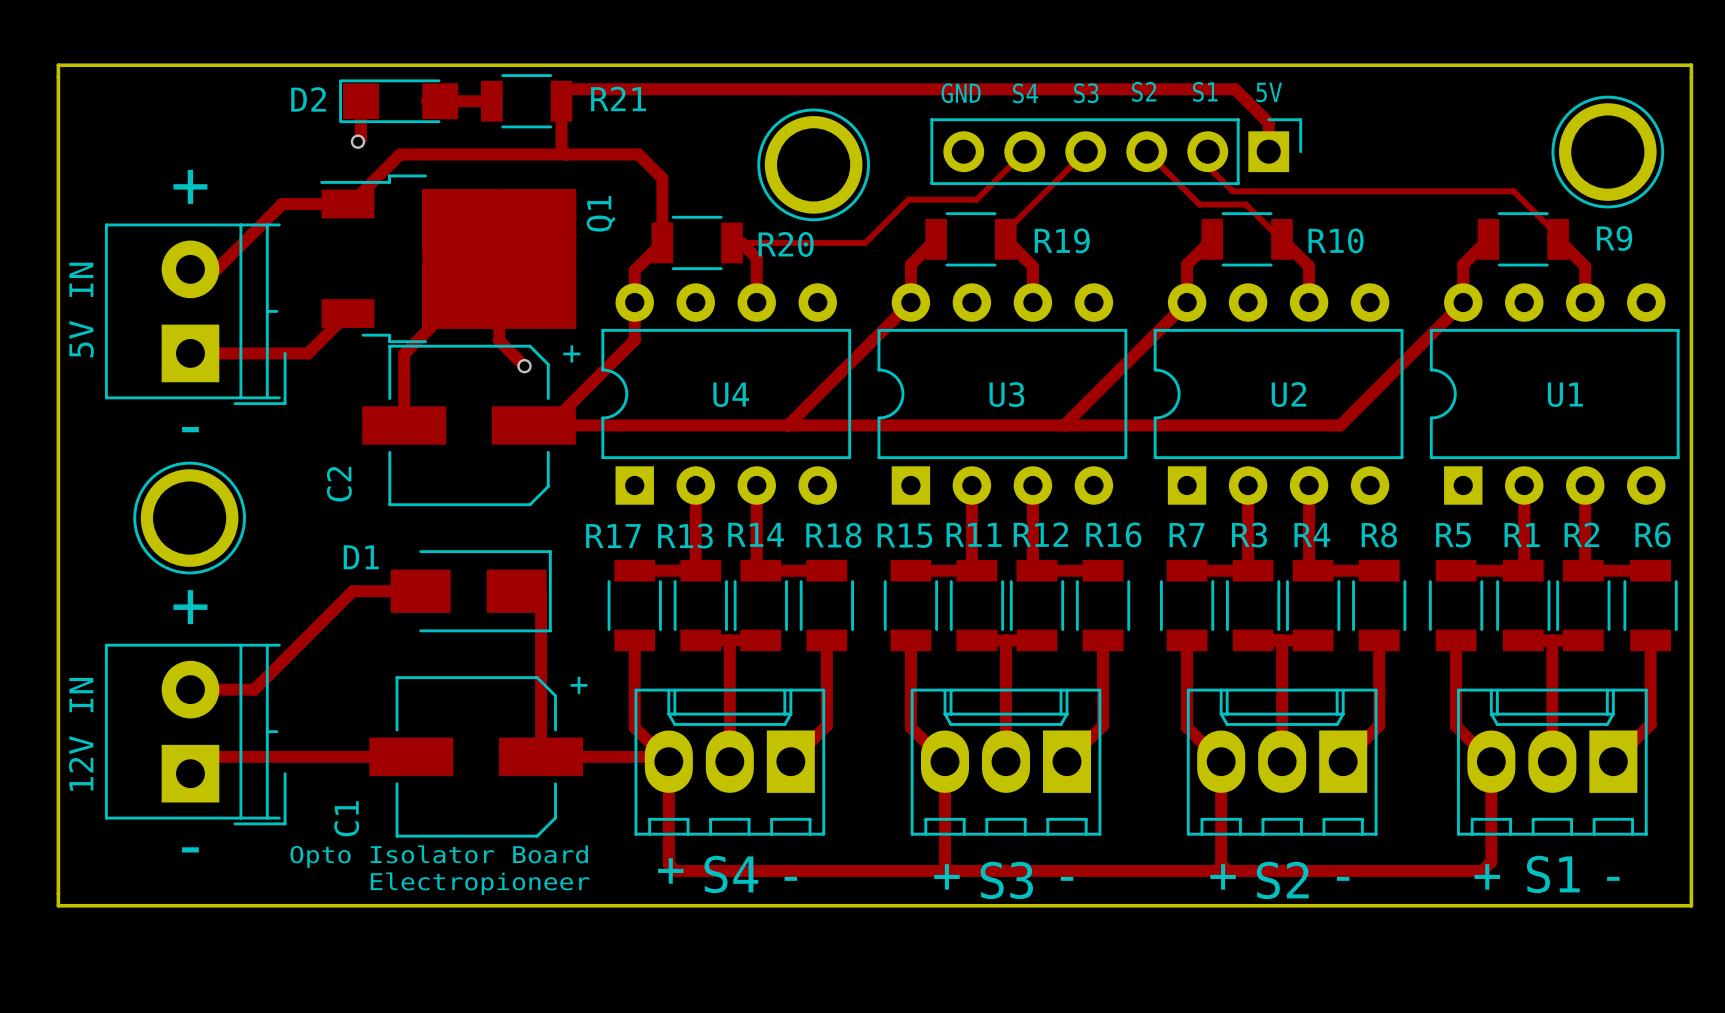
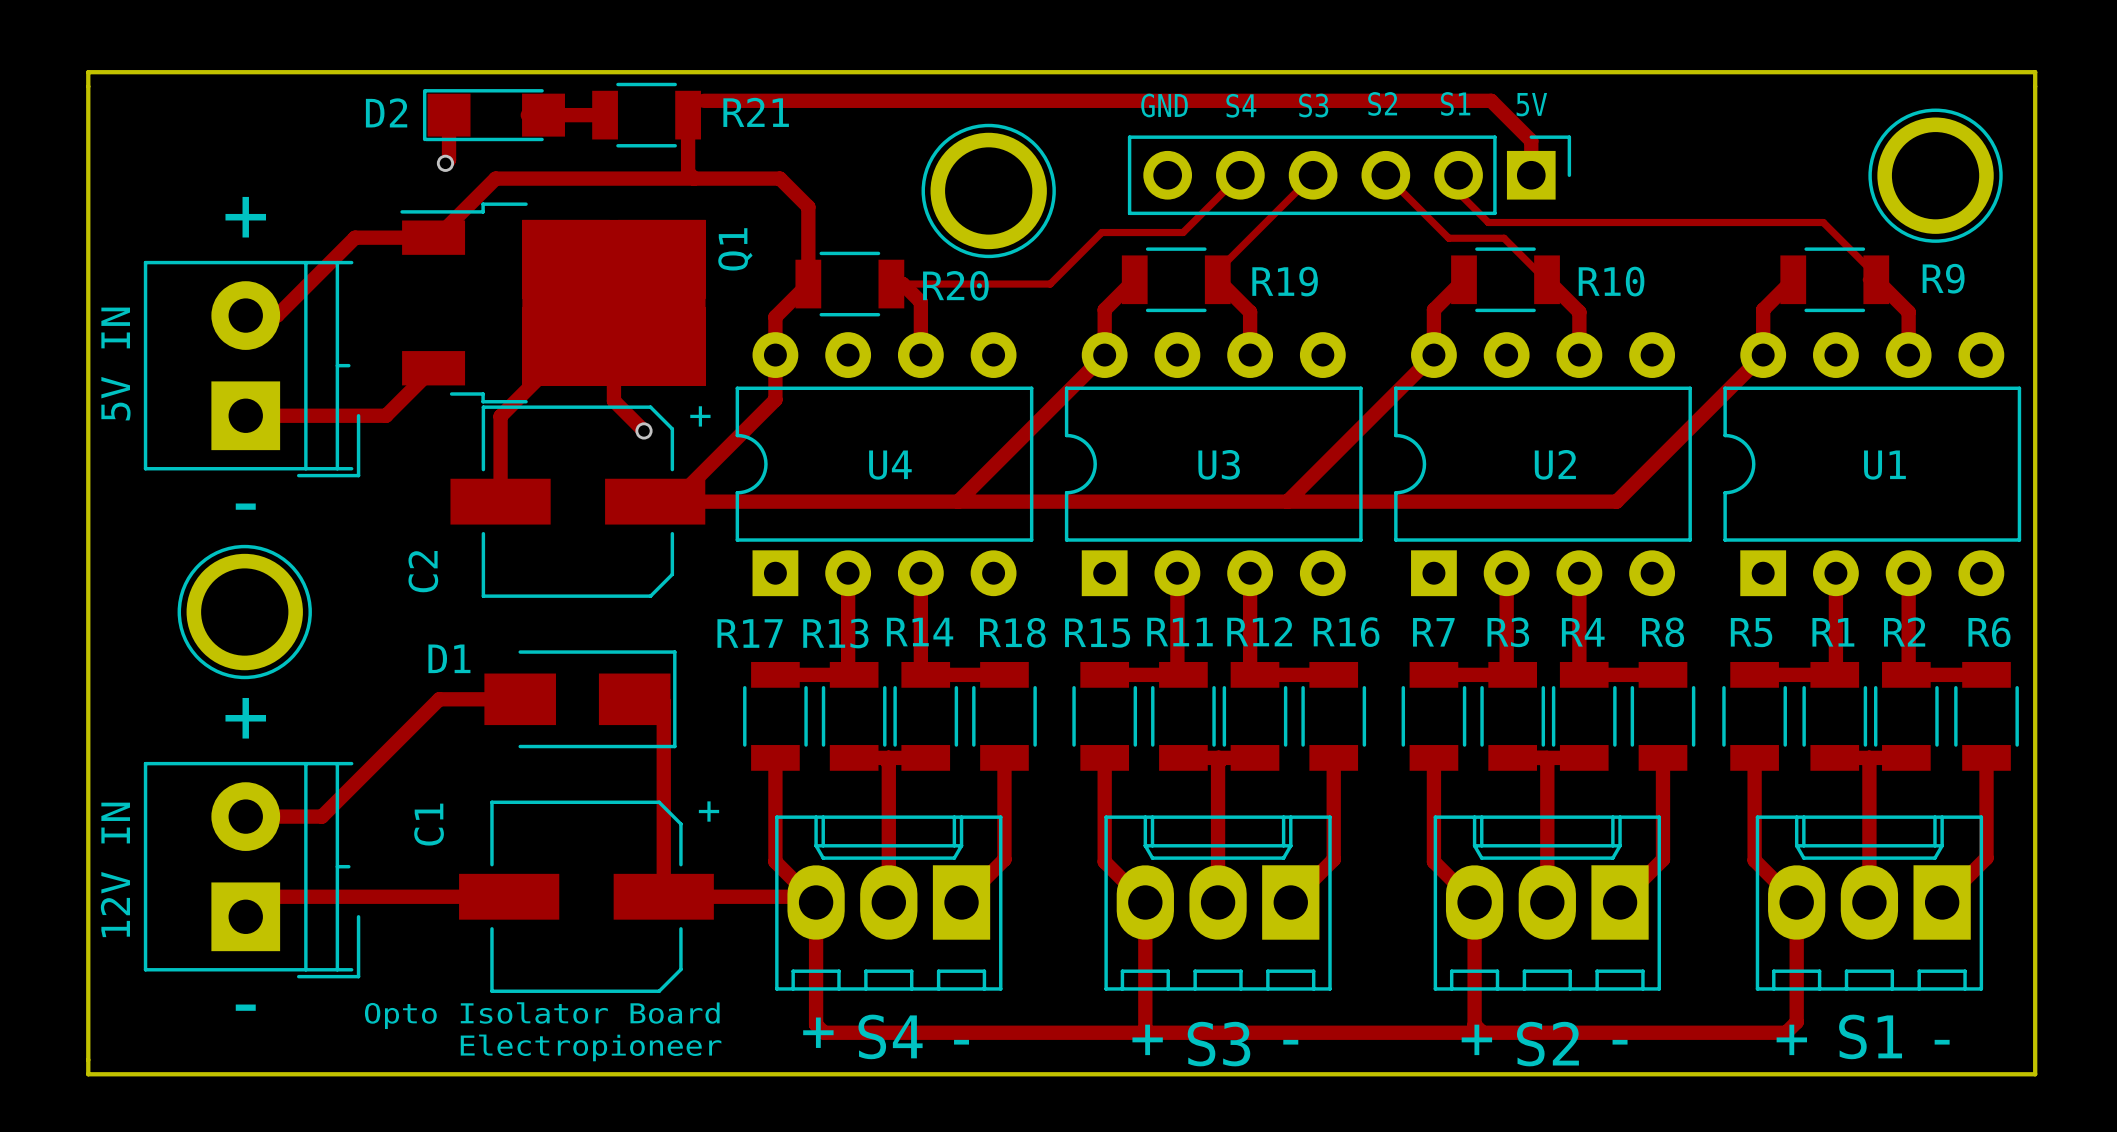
C1 name position: C1 (346, 818) -> C1 (429, 824)

